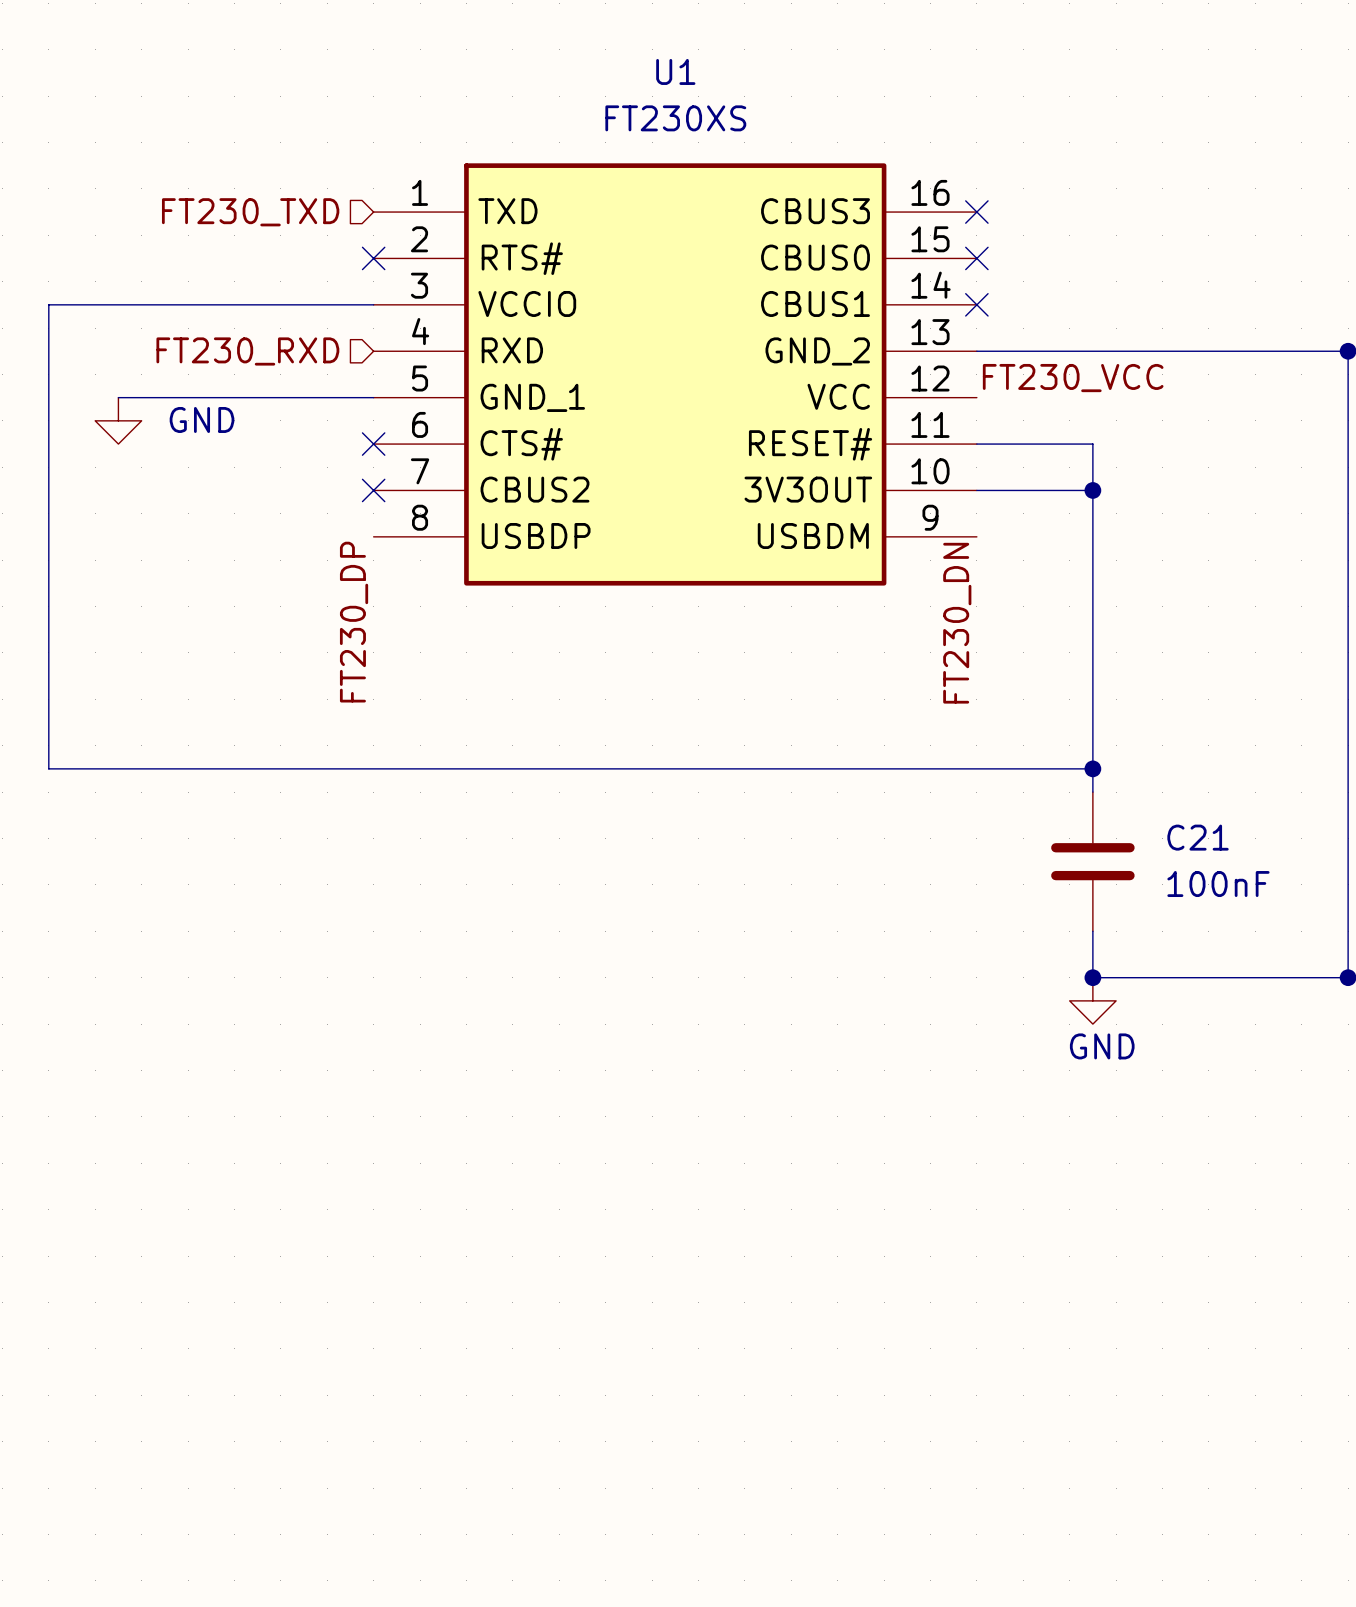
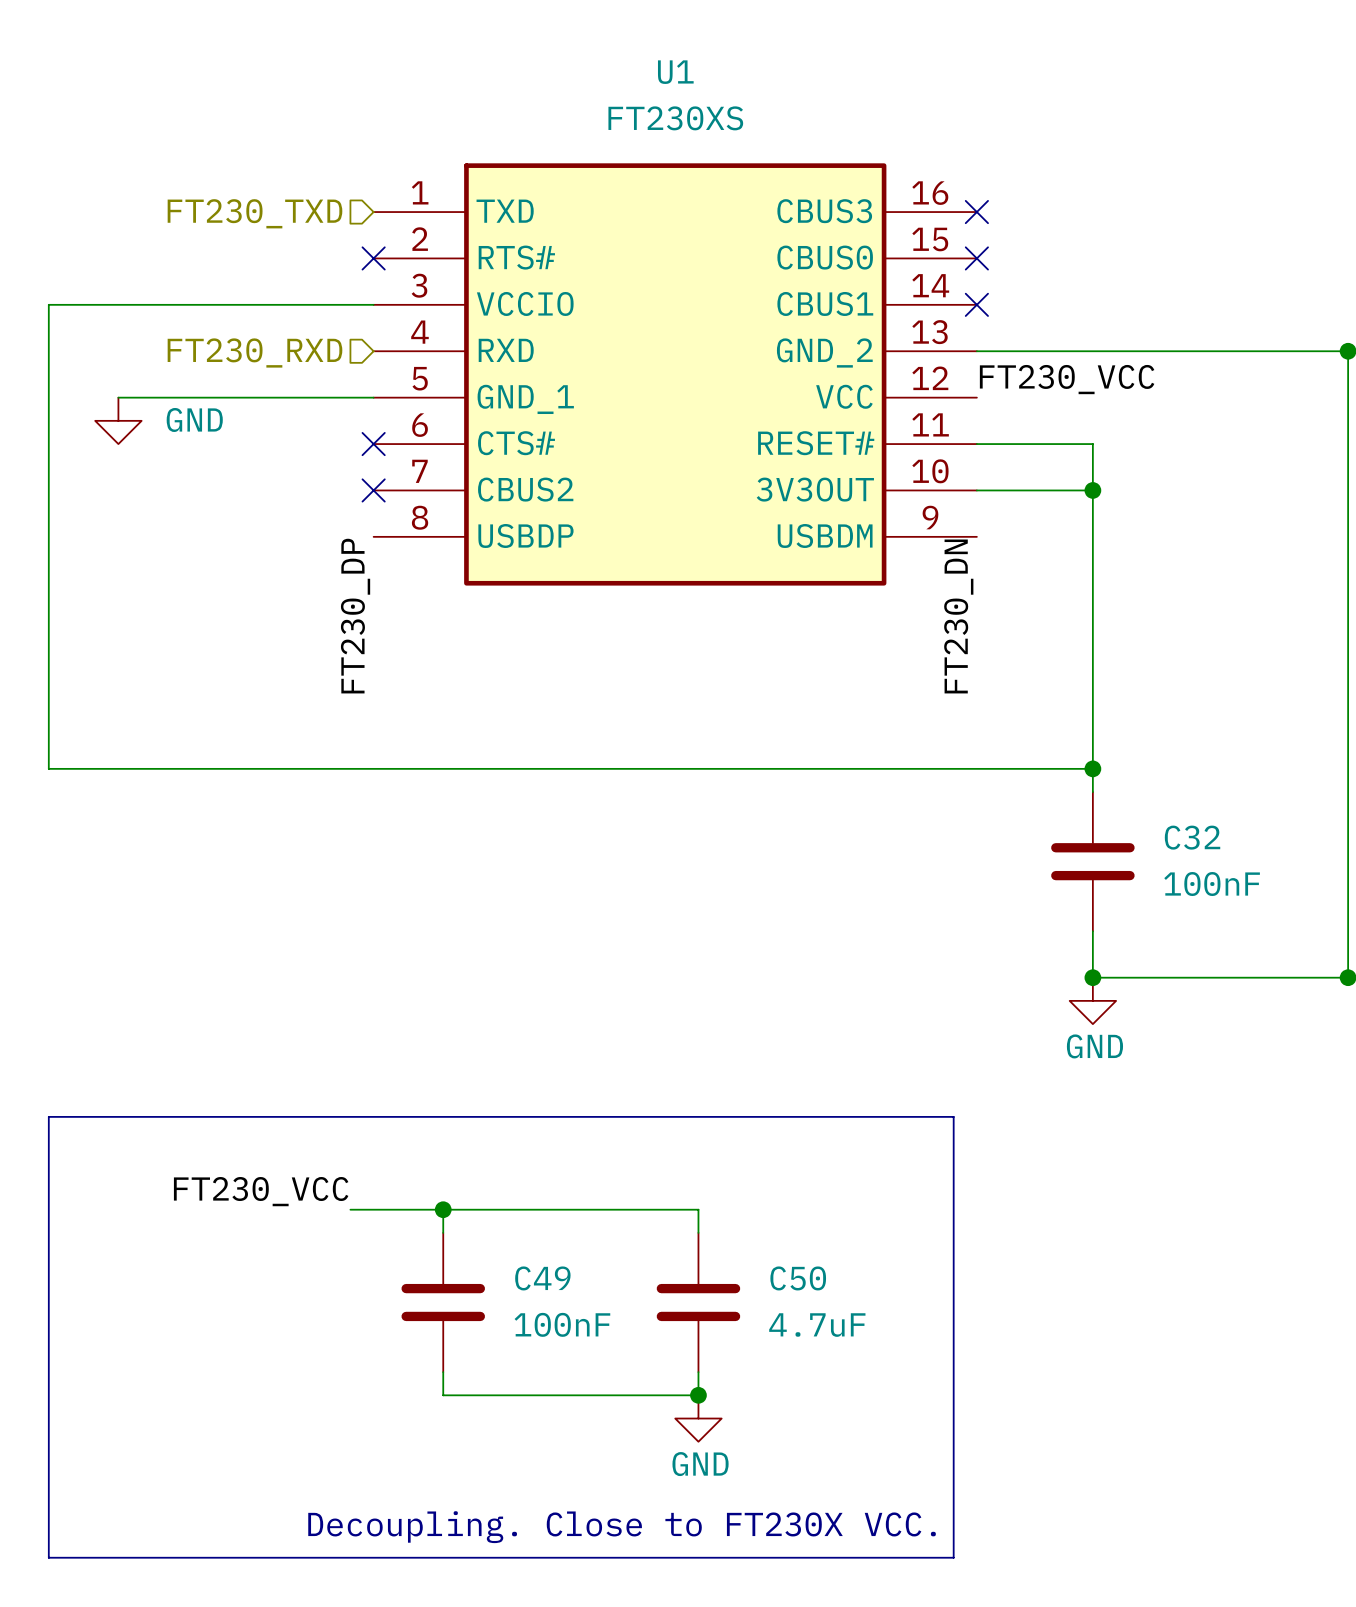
C21 name: C21 (1198, 837) -> C32 (1192, 837)
line: none -> (48, 1116) (953, 1116) (953, 1557) (48, 1557) (48, 1116)
label: none -> FT230_VCC (261, 1191)
wire: none -> (350, 1209) (698, 1209) (698, 1232)
wire: none -> (443, 1209) (443, 1232)
junction: none -> (443, 1209)
C49: none -> 100nF (443, 1302)
C50: none -> 4.7uF (698, 1302)
wire: none -> (443, 1372) (443, 1395) (698, 1395) (698, 1372)
junction: none -> (698, 1395)
power symbol: none -> GND (698, 1418)
text: none -> Decoupling. Close to FT230X VCC. (622, 1527)

